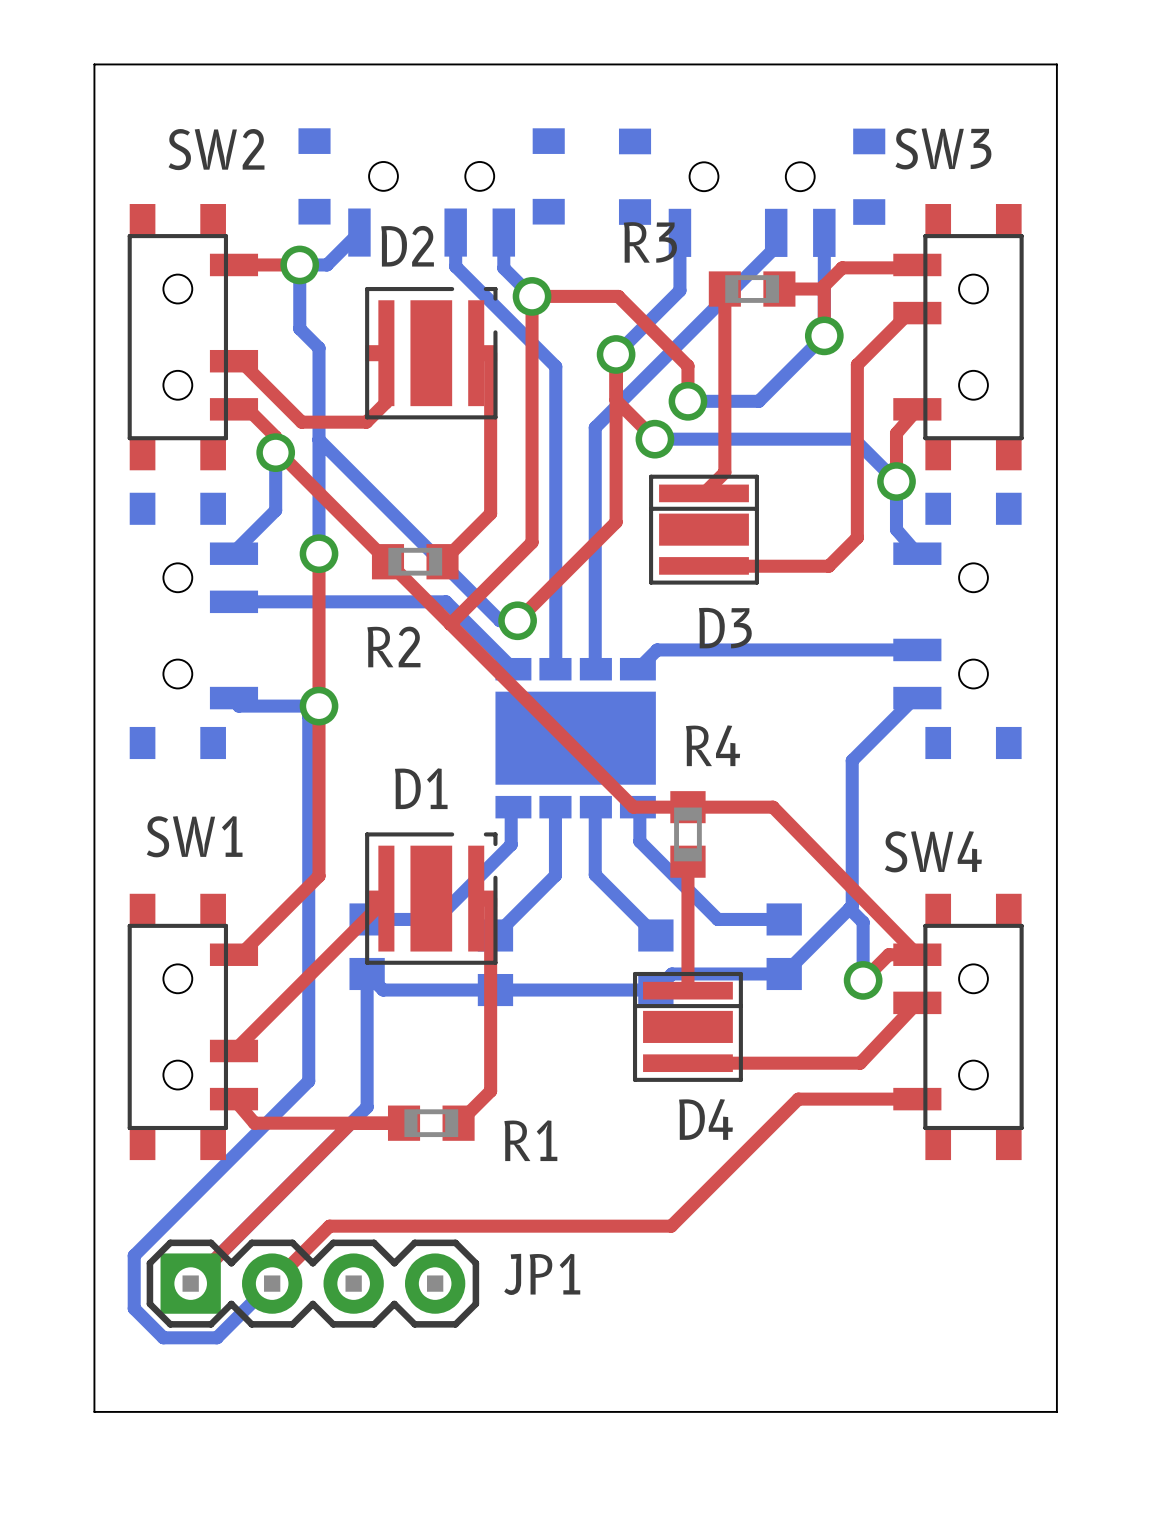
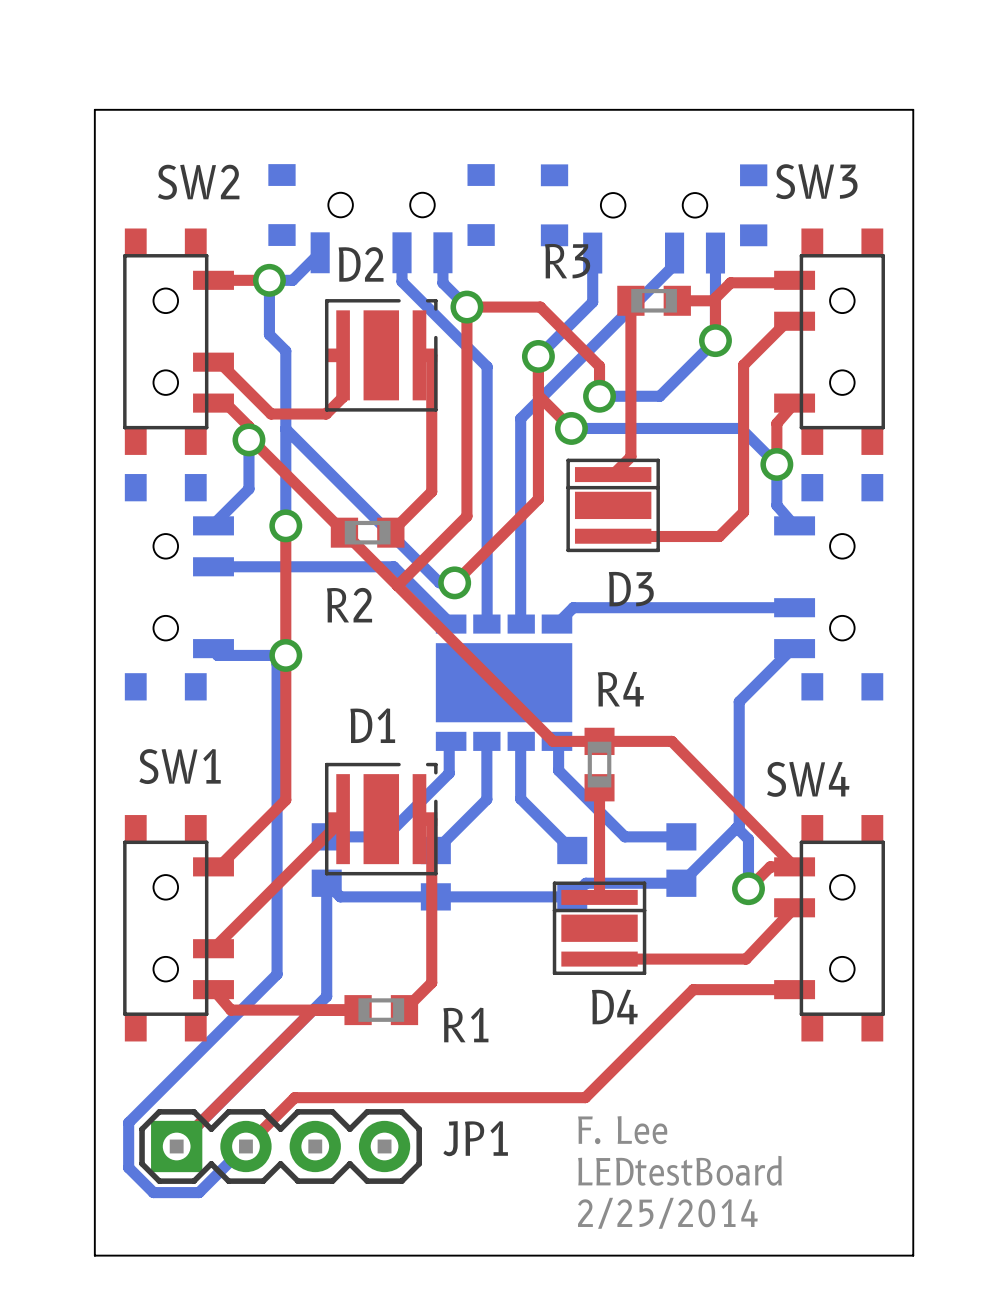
text: none -> F. Lee (622, 1130)
text: none -> LEDtestBoard (679, 1170)
text: none -> 2/25/2014 (667, 1213)

